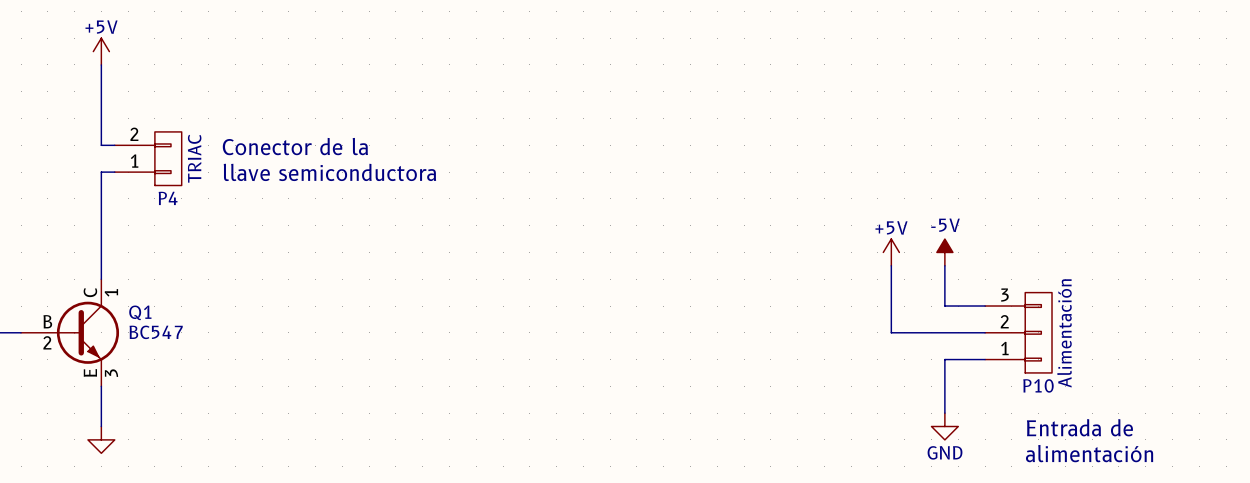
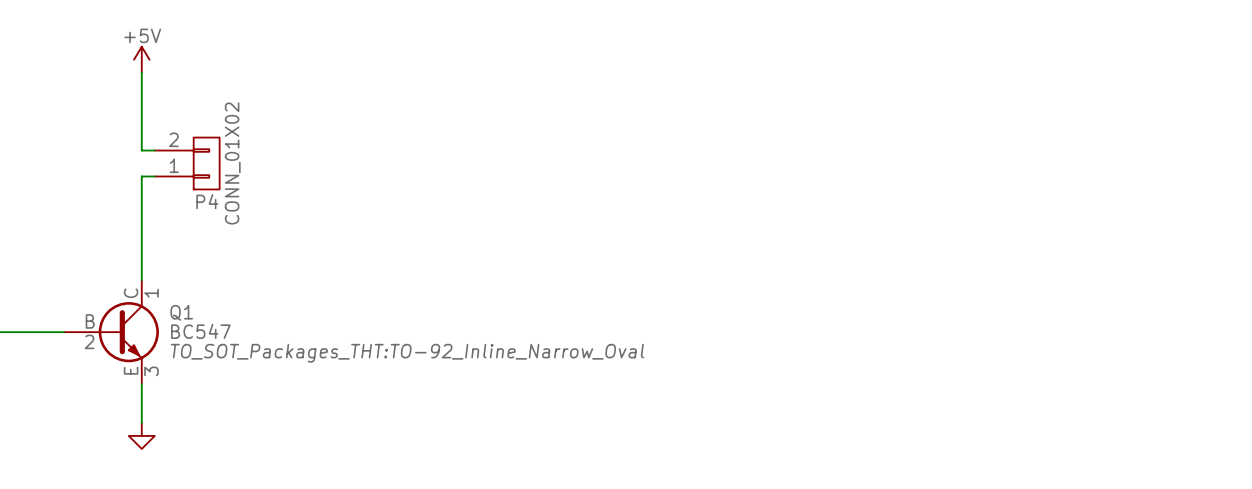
text: Conector de la (295, 146) -> none
P4 value: TRIAC (194, 158) -> CONN_01X02 (232, 163)
text: llave semiconductora (329, 172) -> none
power symbol: +5V (891, 252) -> none
power symbol: -5V (944, 252) -> none
wire: (891, 265) (891, 332) (985, 332) -> none
wire: (944, 265) (944, 306) (985, 306) -> none
P10: Alimentación (1018, 332) -> none
Q1 text: none -> TO_SOT_Packages_THT:TO-92_Inline_Narrow_Oval (407, 353)
wire: (985, 359) (944, 359) (944, 413) -> none
power symbol: GND (944, 426) -> none
text: Entrada de (1079, 427) -> none
text: alimentación (1089, 453) -> none

